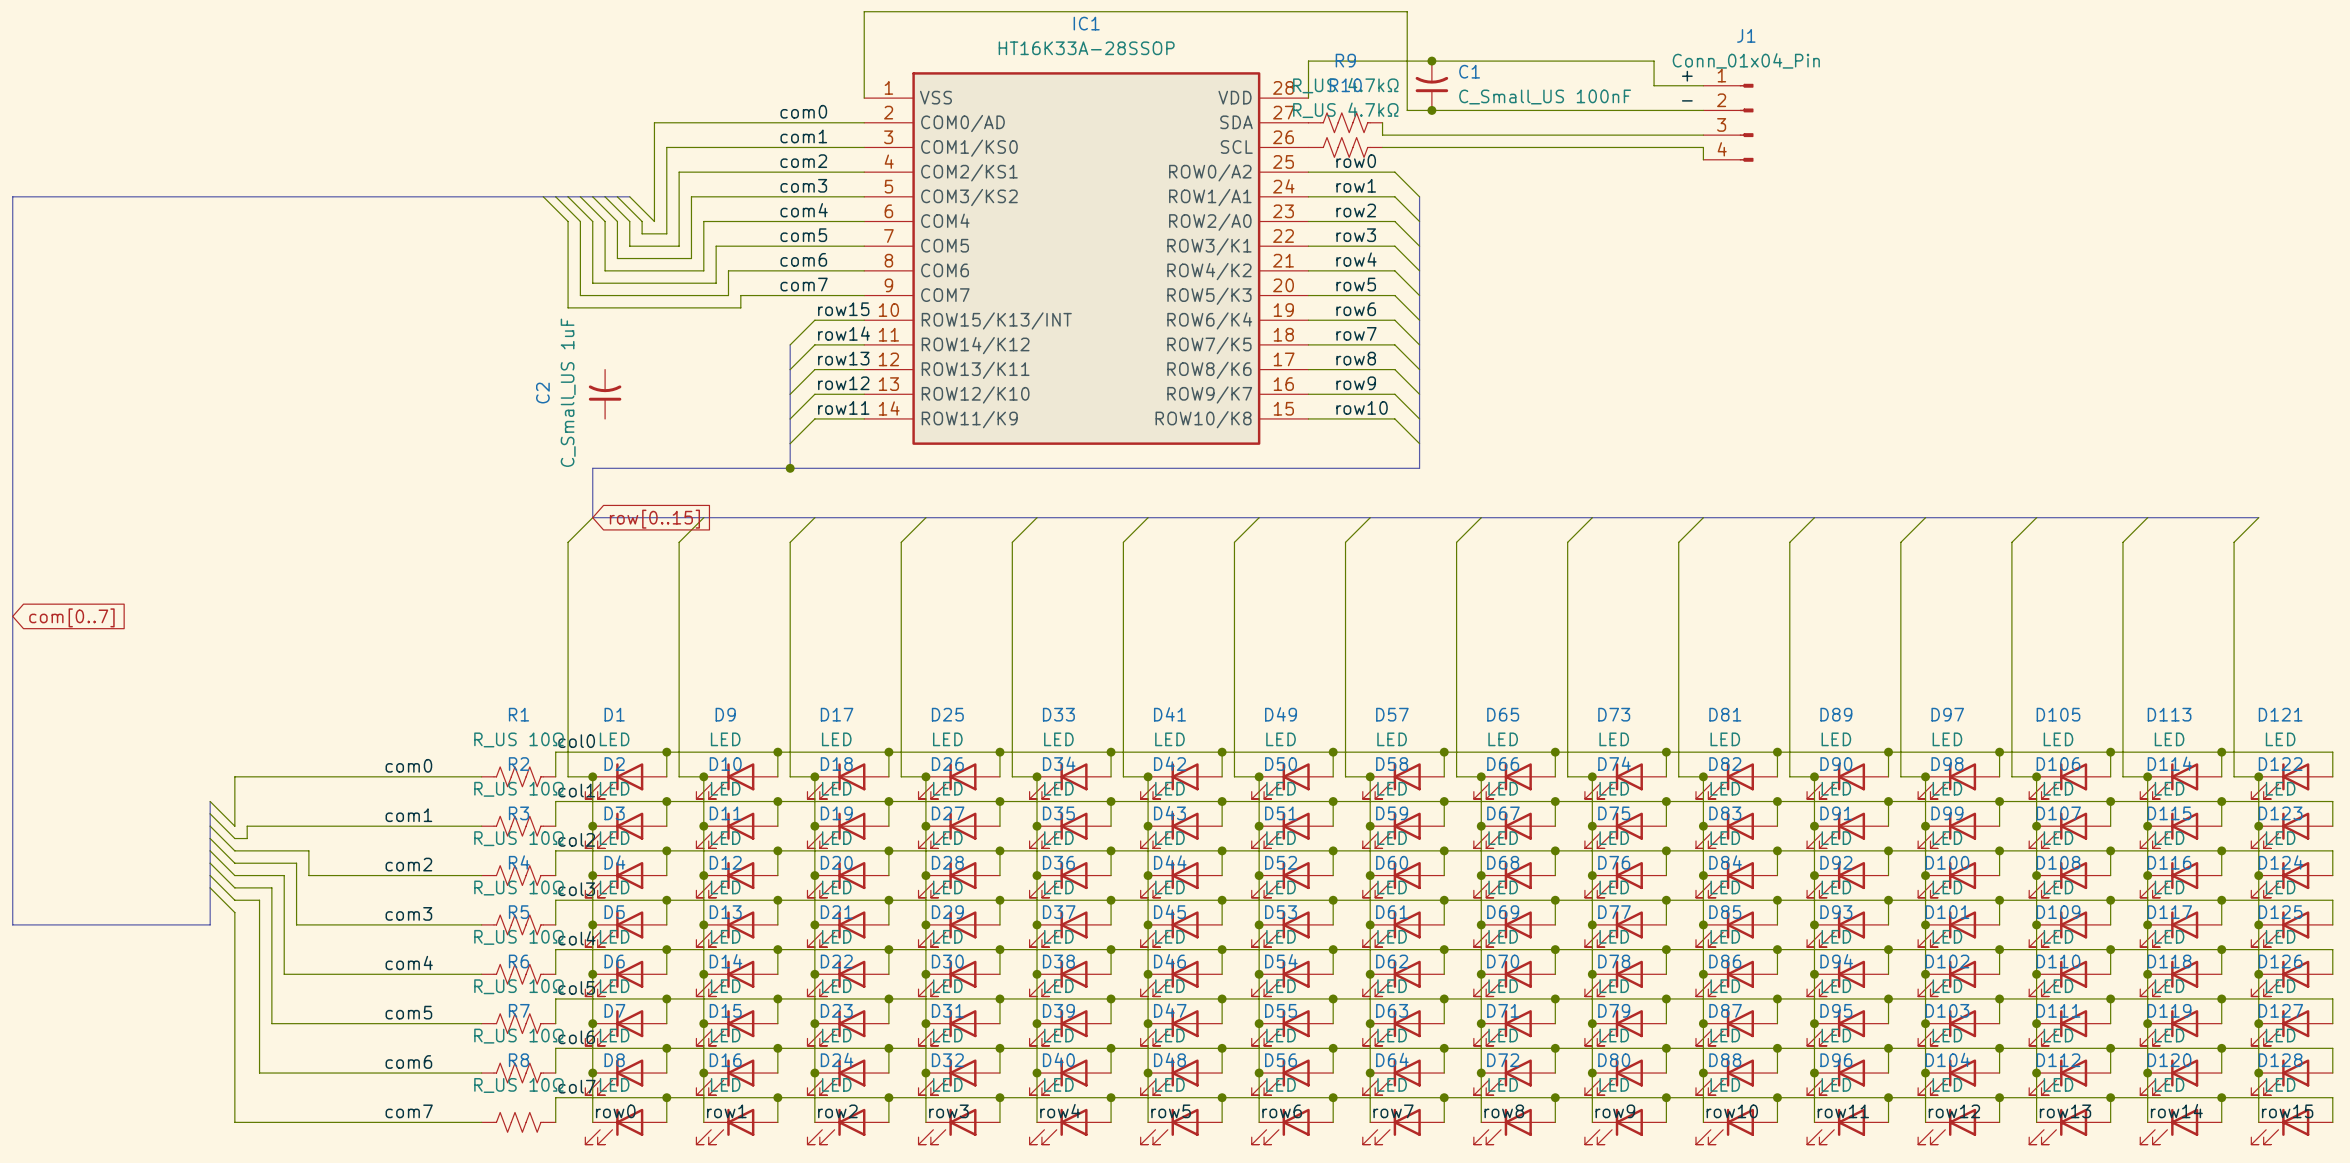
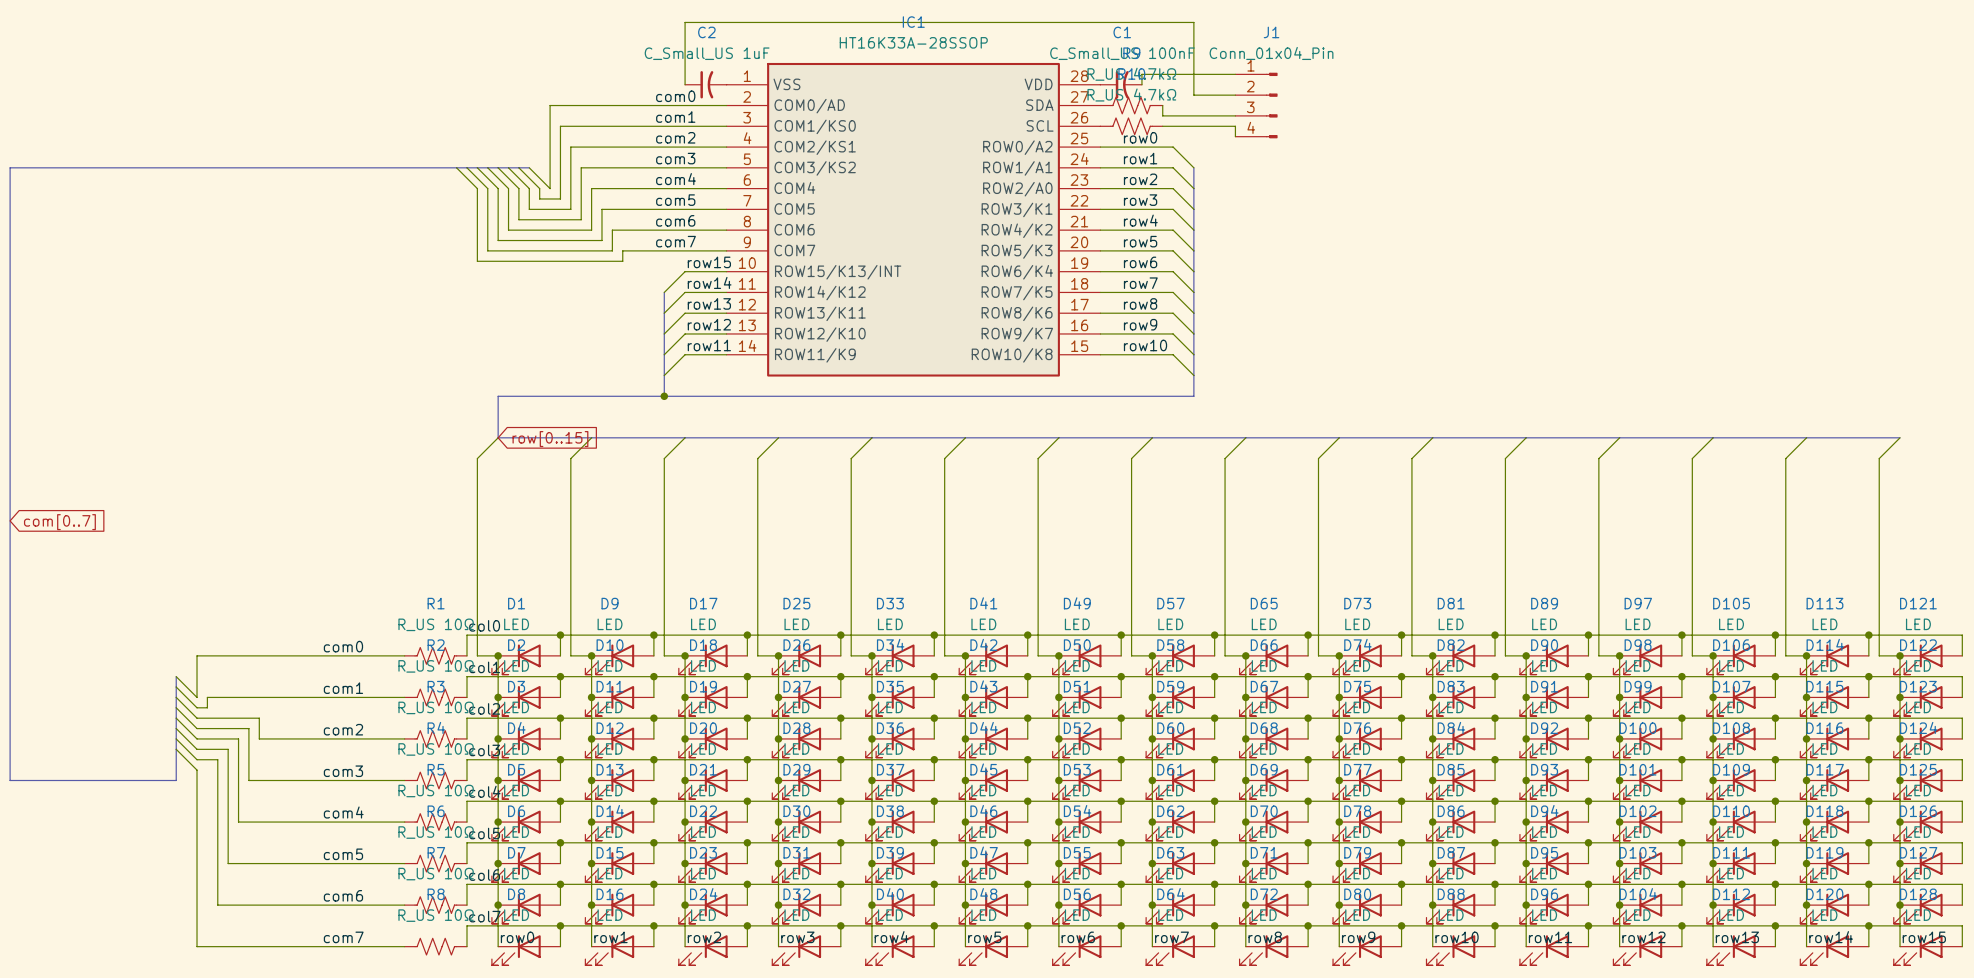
junction: (1431, 61) -> none
C1 name position: C1 (1469, 71) -> C1 (1122, 32)
label: + (1687, 76) -> none
C1 rotation: 0° (1431, 84) -> 90° clockwise (1122, 84)
C1 position: (1431, 85) -> (1121, 84)
wire: none -> (1235, 74) (1141, 74) (1141, 84)
wire: (1703, 85) (1654, 85) (1654, 61) (1308, 61) (1308, 98) -> none
C1 value position: C_Small_US 100nF (1545, 96) -> C_Small_US 100nF (1122, 53)
wire: (864, 98) (864, 11) (1407, 11) (1407, 110) (1419, 110) -> (685, 84) (685, 22) (1193, 22) (1193, 95)
label: - (1687, 100) -> none
junction: (1431, 110) -> none
wire: (1468, 110) (1703, 110) -> none
J1 position: (1728, 122) -> (1256, 105)
wire: (1468, 135) (1703, 135) -> none
wire: (1468, 147) (1703, 147) (1703, 159) -> (1235, 126) (1235, 136)
C2 rotation: 0° (605, 393) -> 90° clockwise (706, 84)
C2 position: (605, 394) -> (705, 84)

